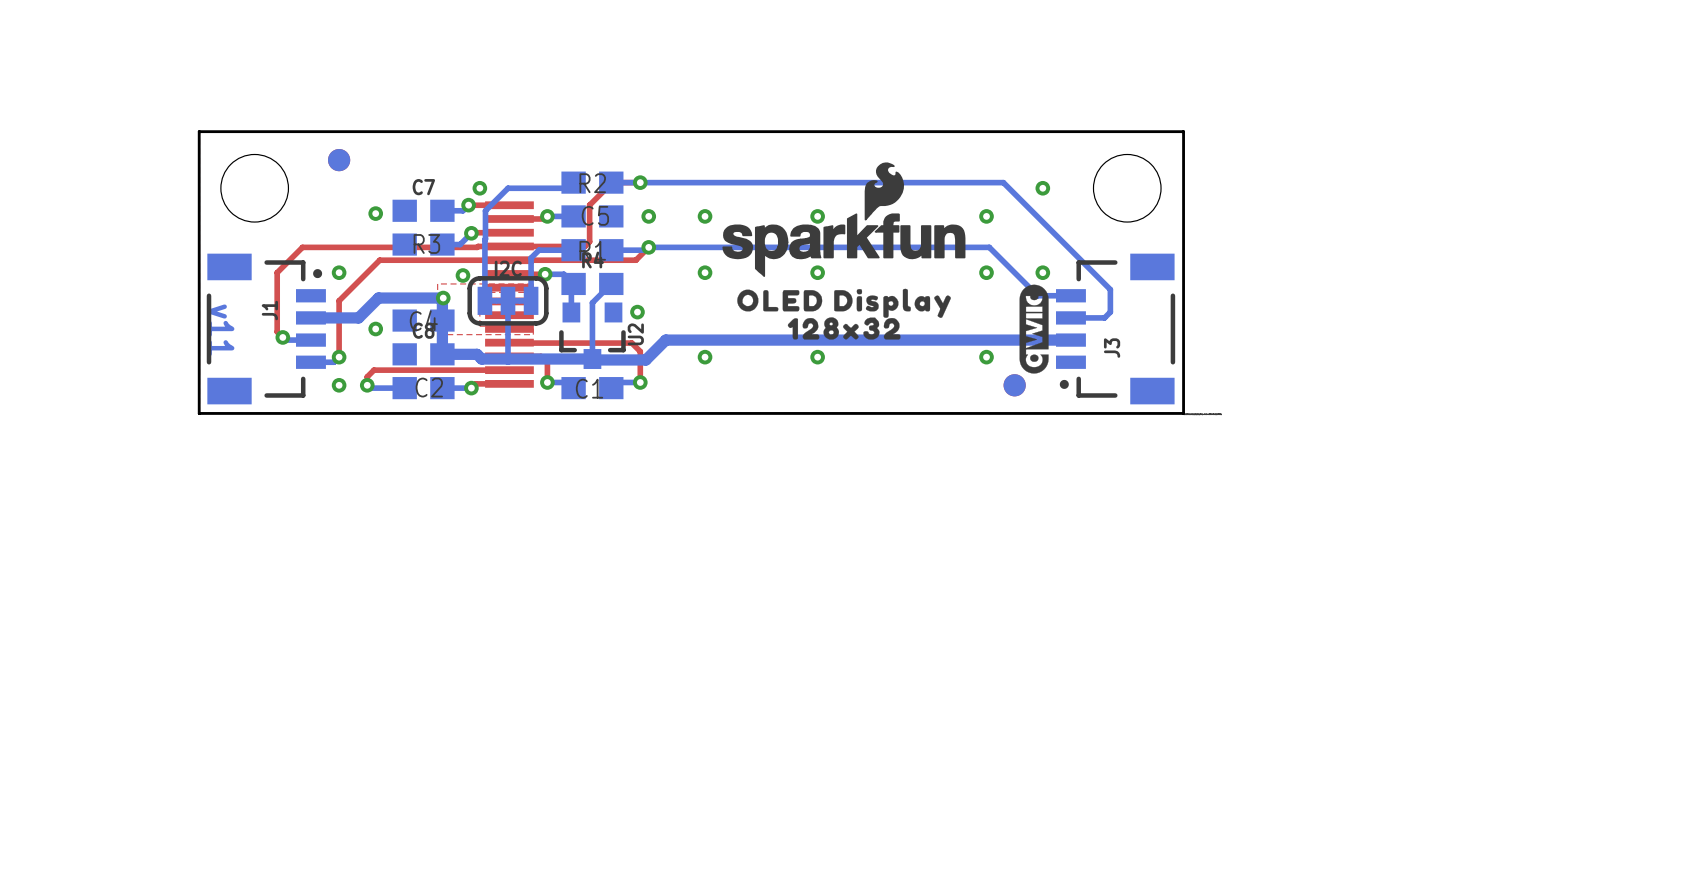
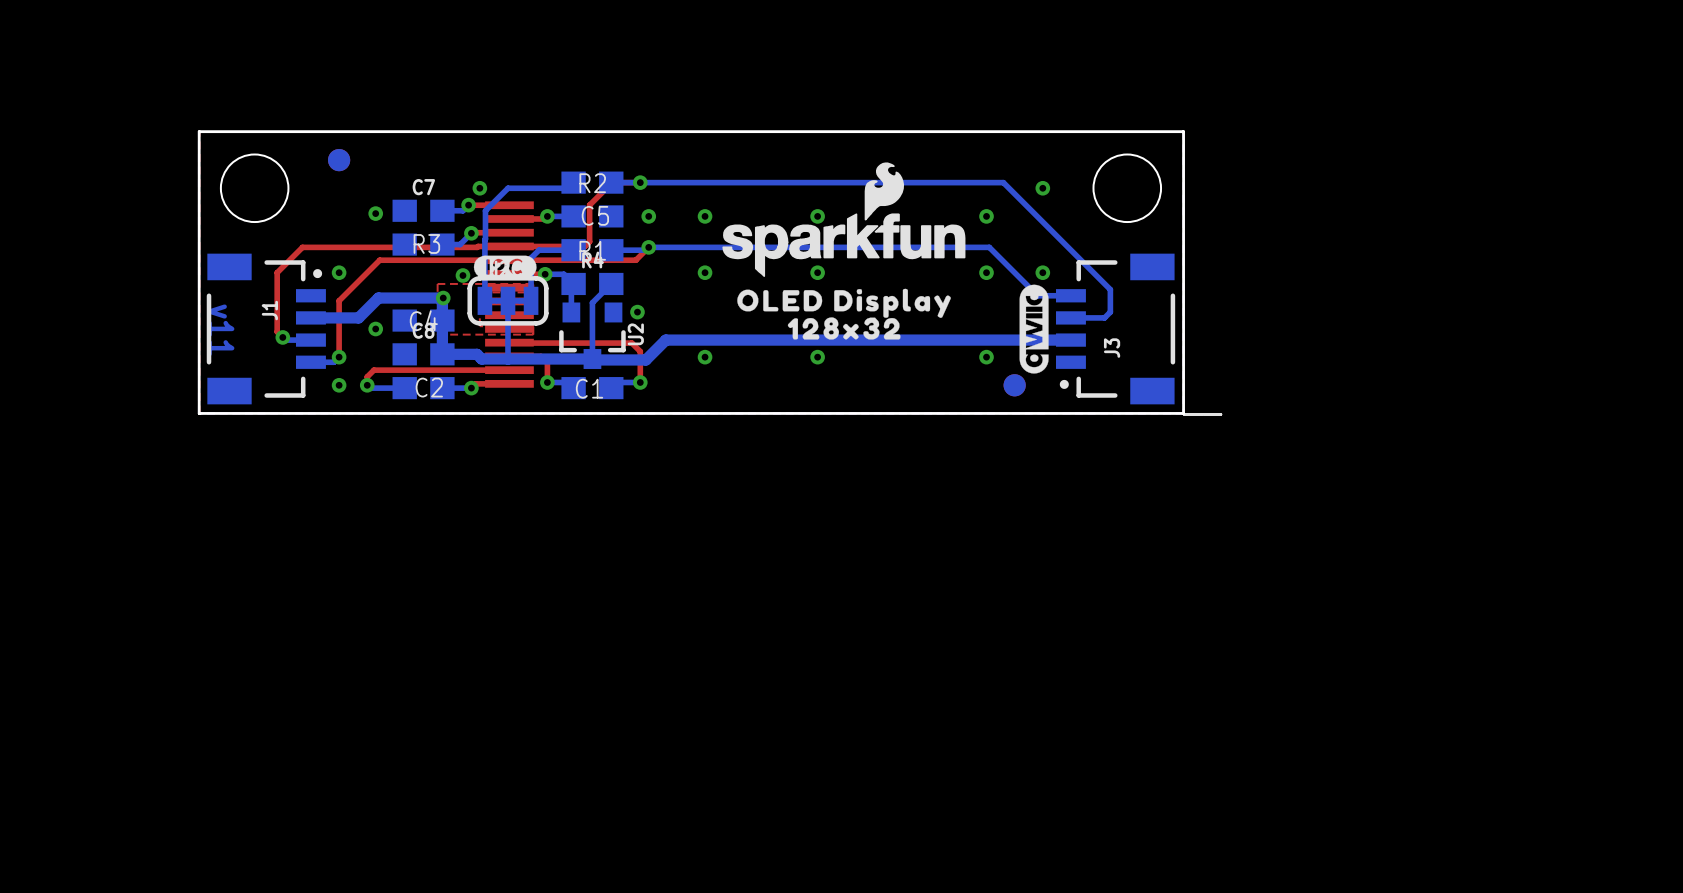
drawing: none -> [473, 255, 537, 279]

